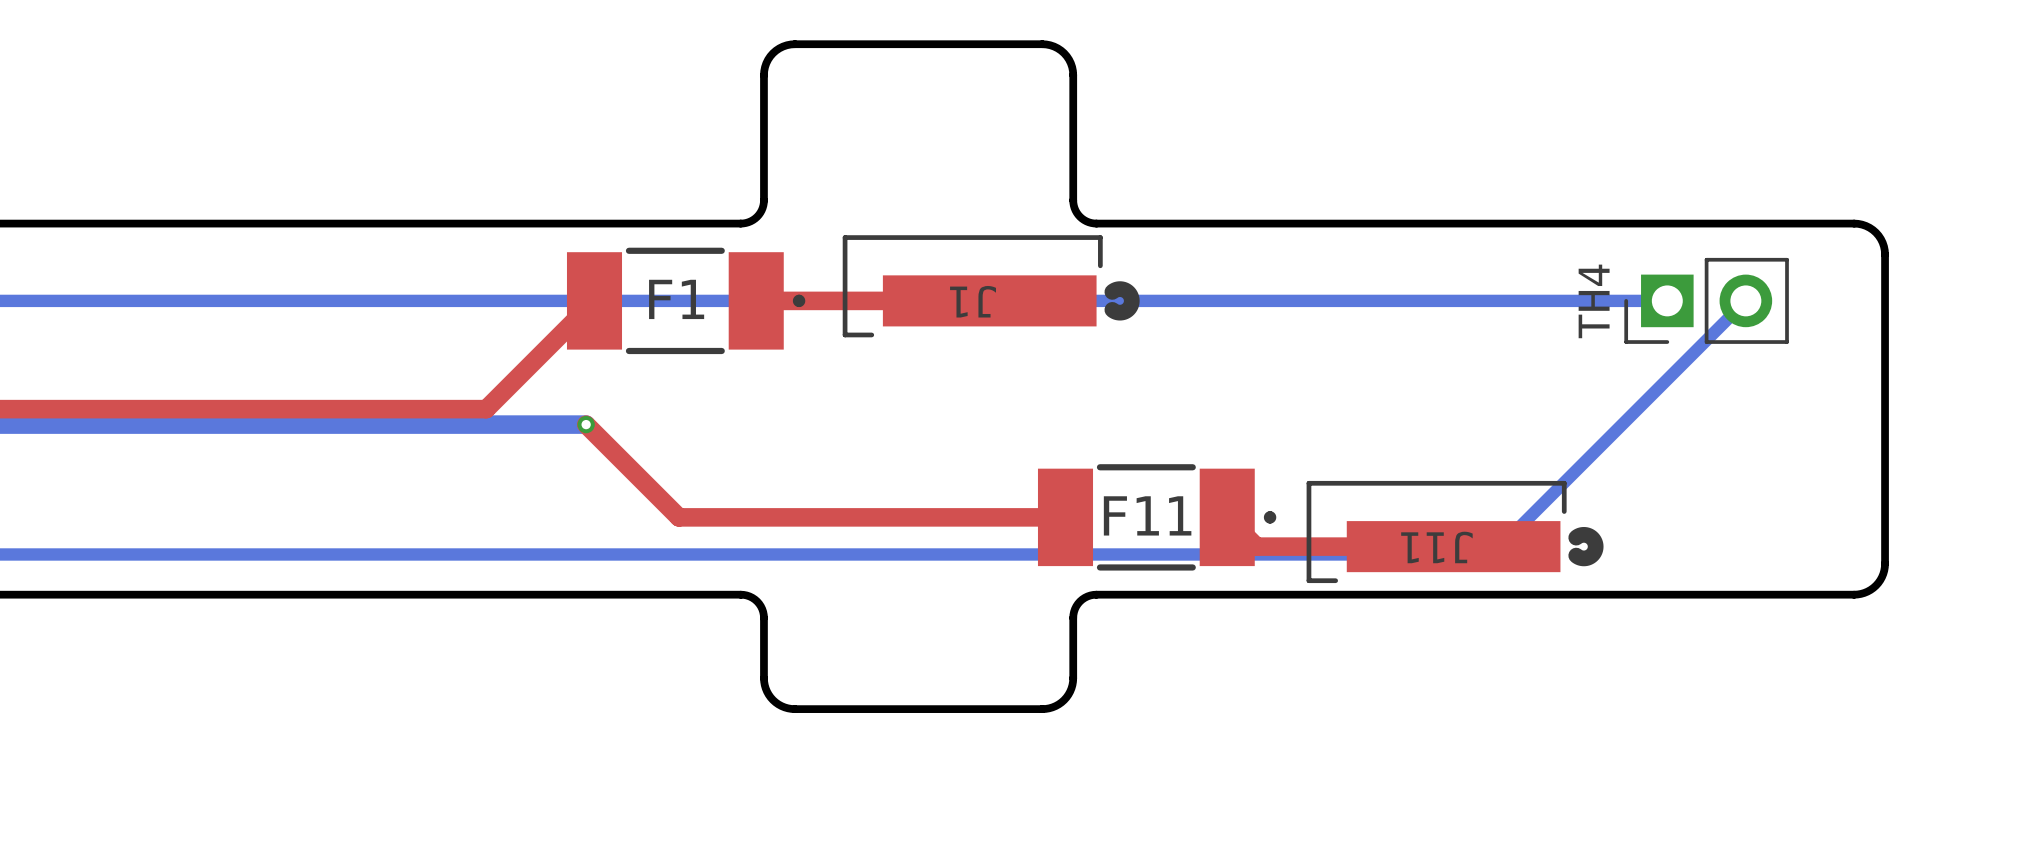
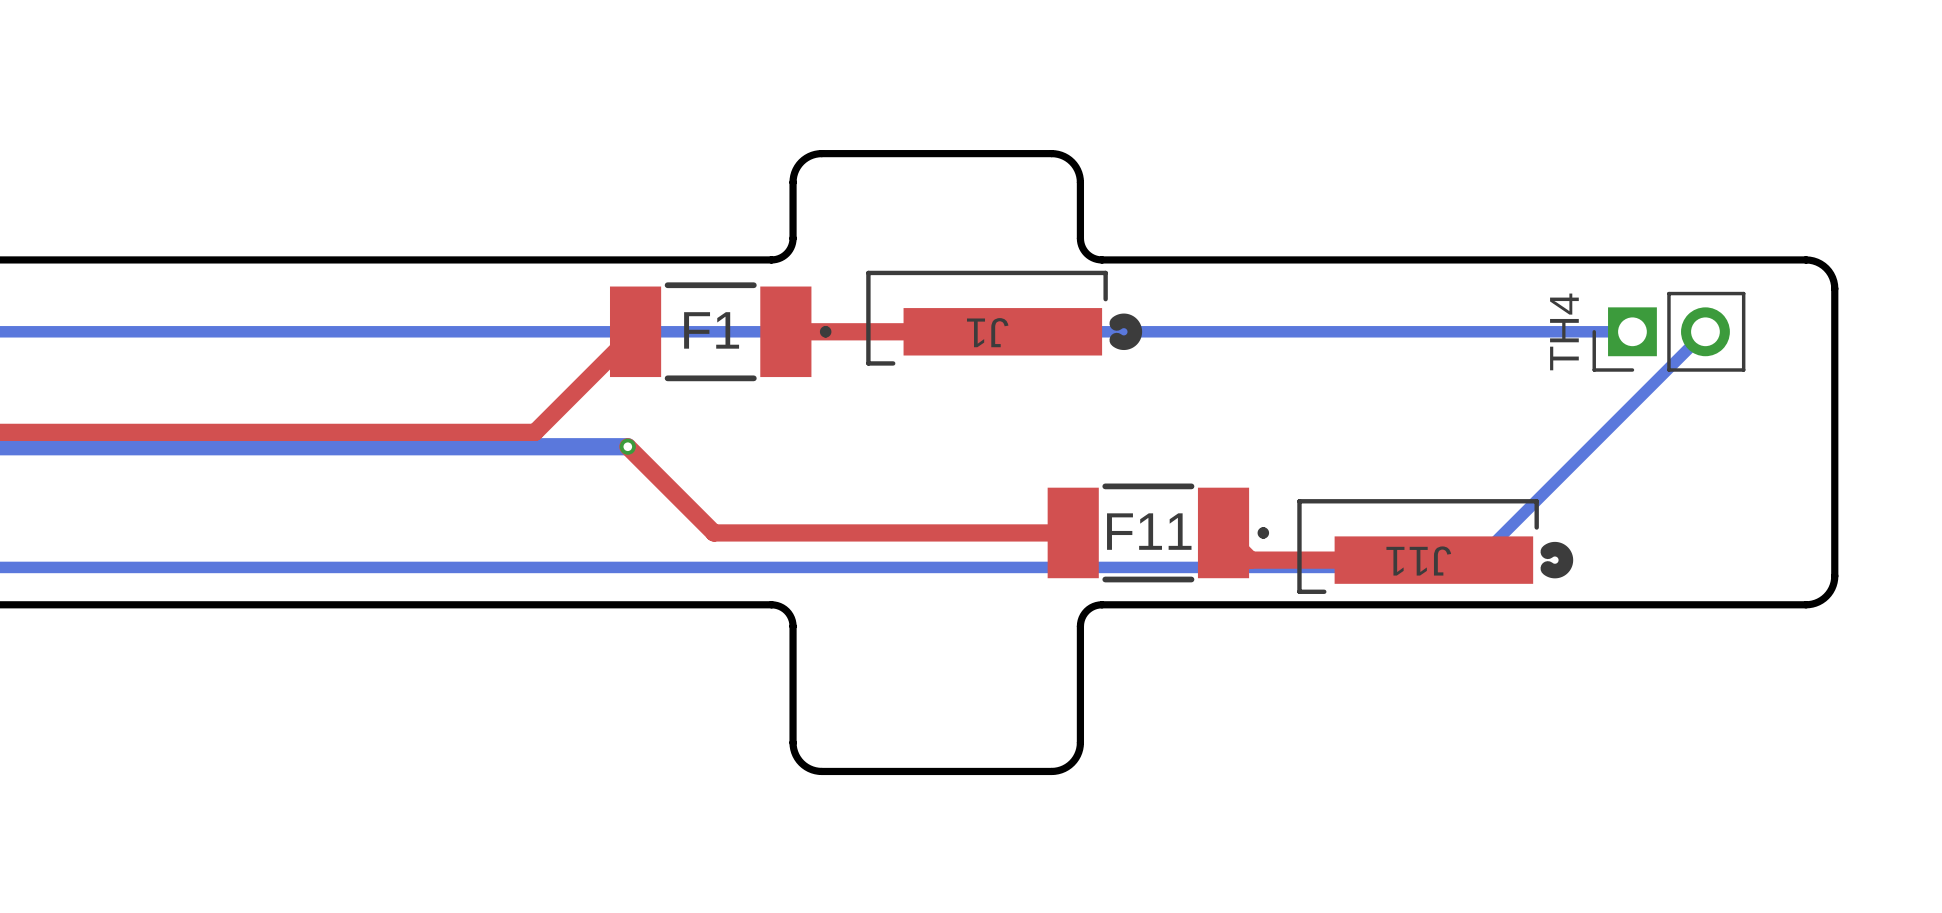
board edge: (763, 140) (765, 67) (768, 59) (776, 50) (786, 45) (794, 44) (1042, 44) (1054, 46) (1066, 56) (1072, 67) (1073, 140) -> (793, 182) (794, 172) (801, 162) (809, 156) (821, 153) (1054, 153) (1064, 156) (1072, 162) (1077, 169) (1080, 182)
board edge: (763, 678) (767, 691) (773, 700) (784, 707) (794, 709) (1045, 708) (1055, 706) (1064, 700) (1070, 691) (1073, 678) -> (793, 682) (794, 752) (803, 765) (812, 769) (821, 771) (1051, 771) (1061, 769) (1072, 763) (1079, 749) (1080, 682)

